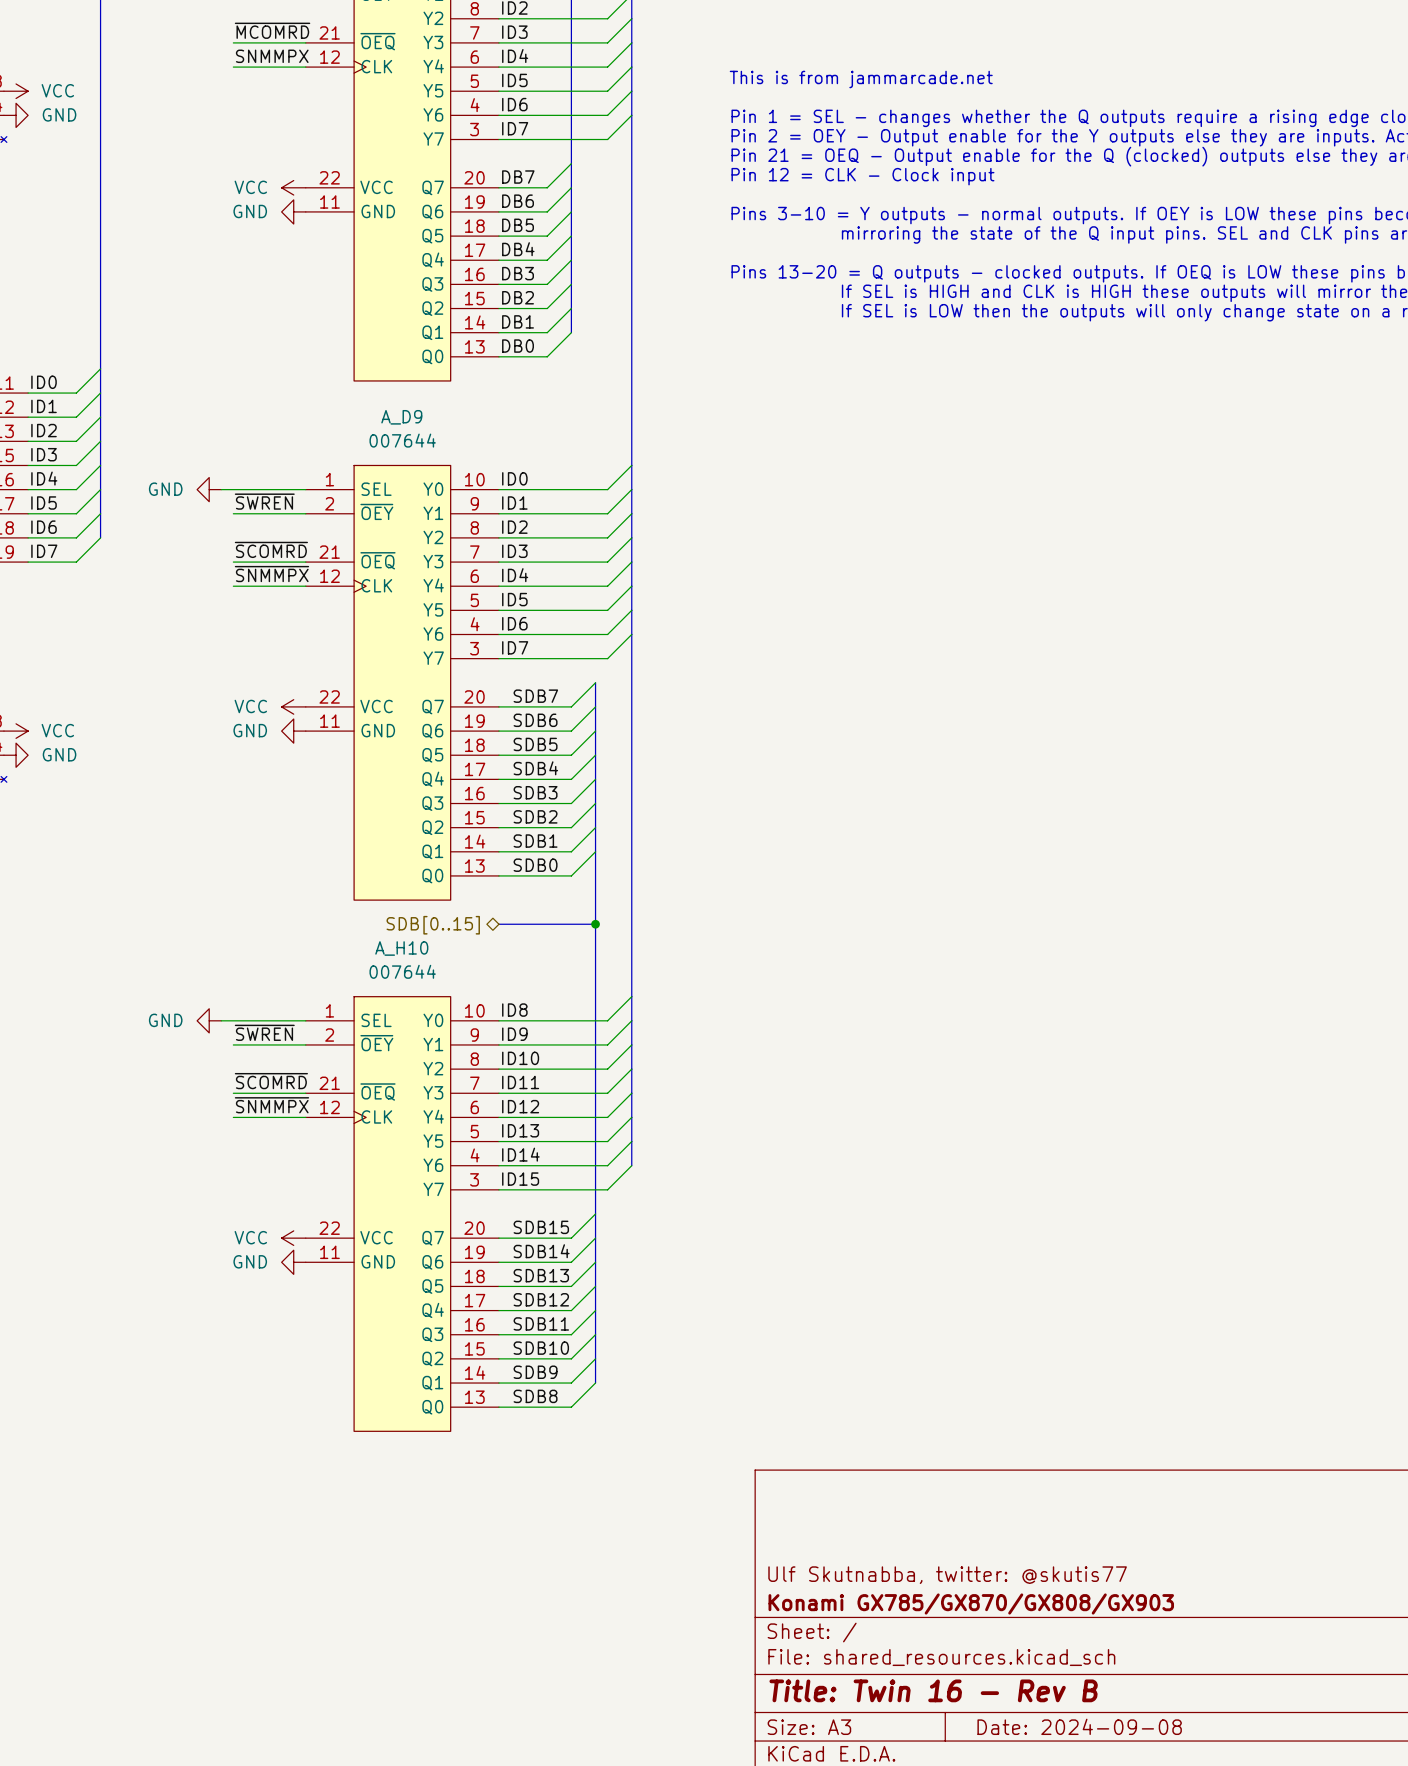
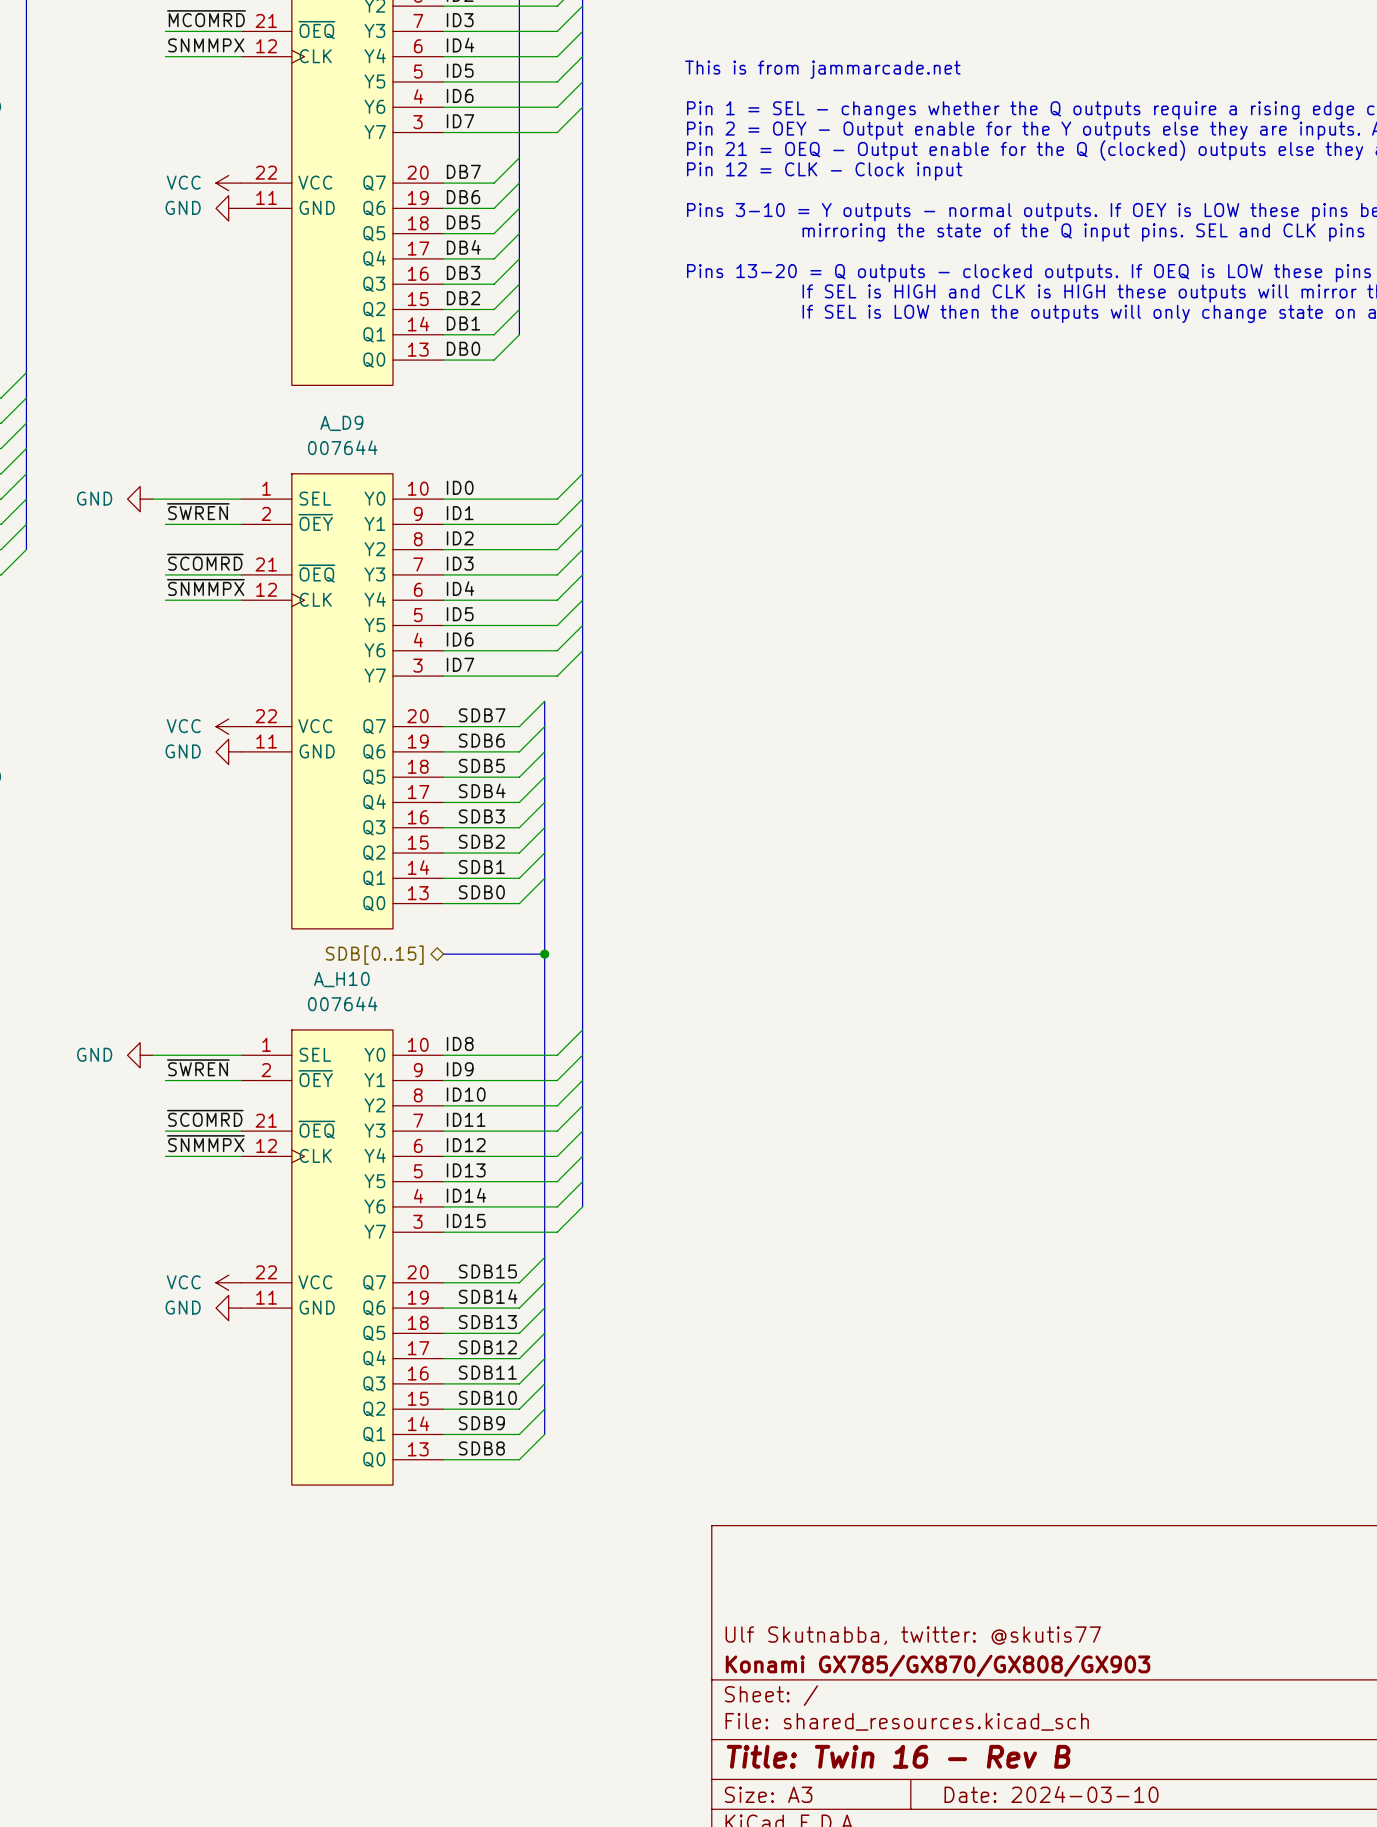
title block: Date: 2024-09-08 (1079, 1726) -> Date: 2024-03-10 (1051, 1794)

